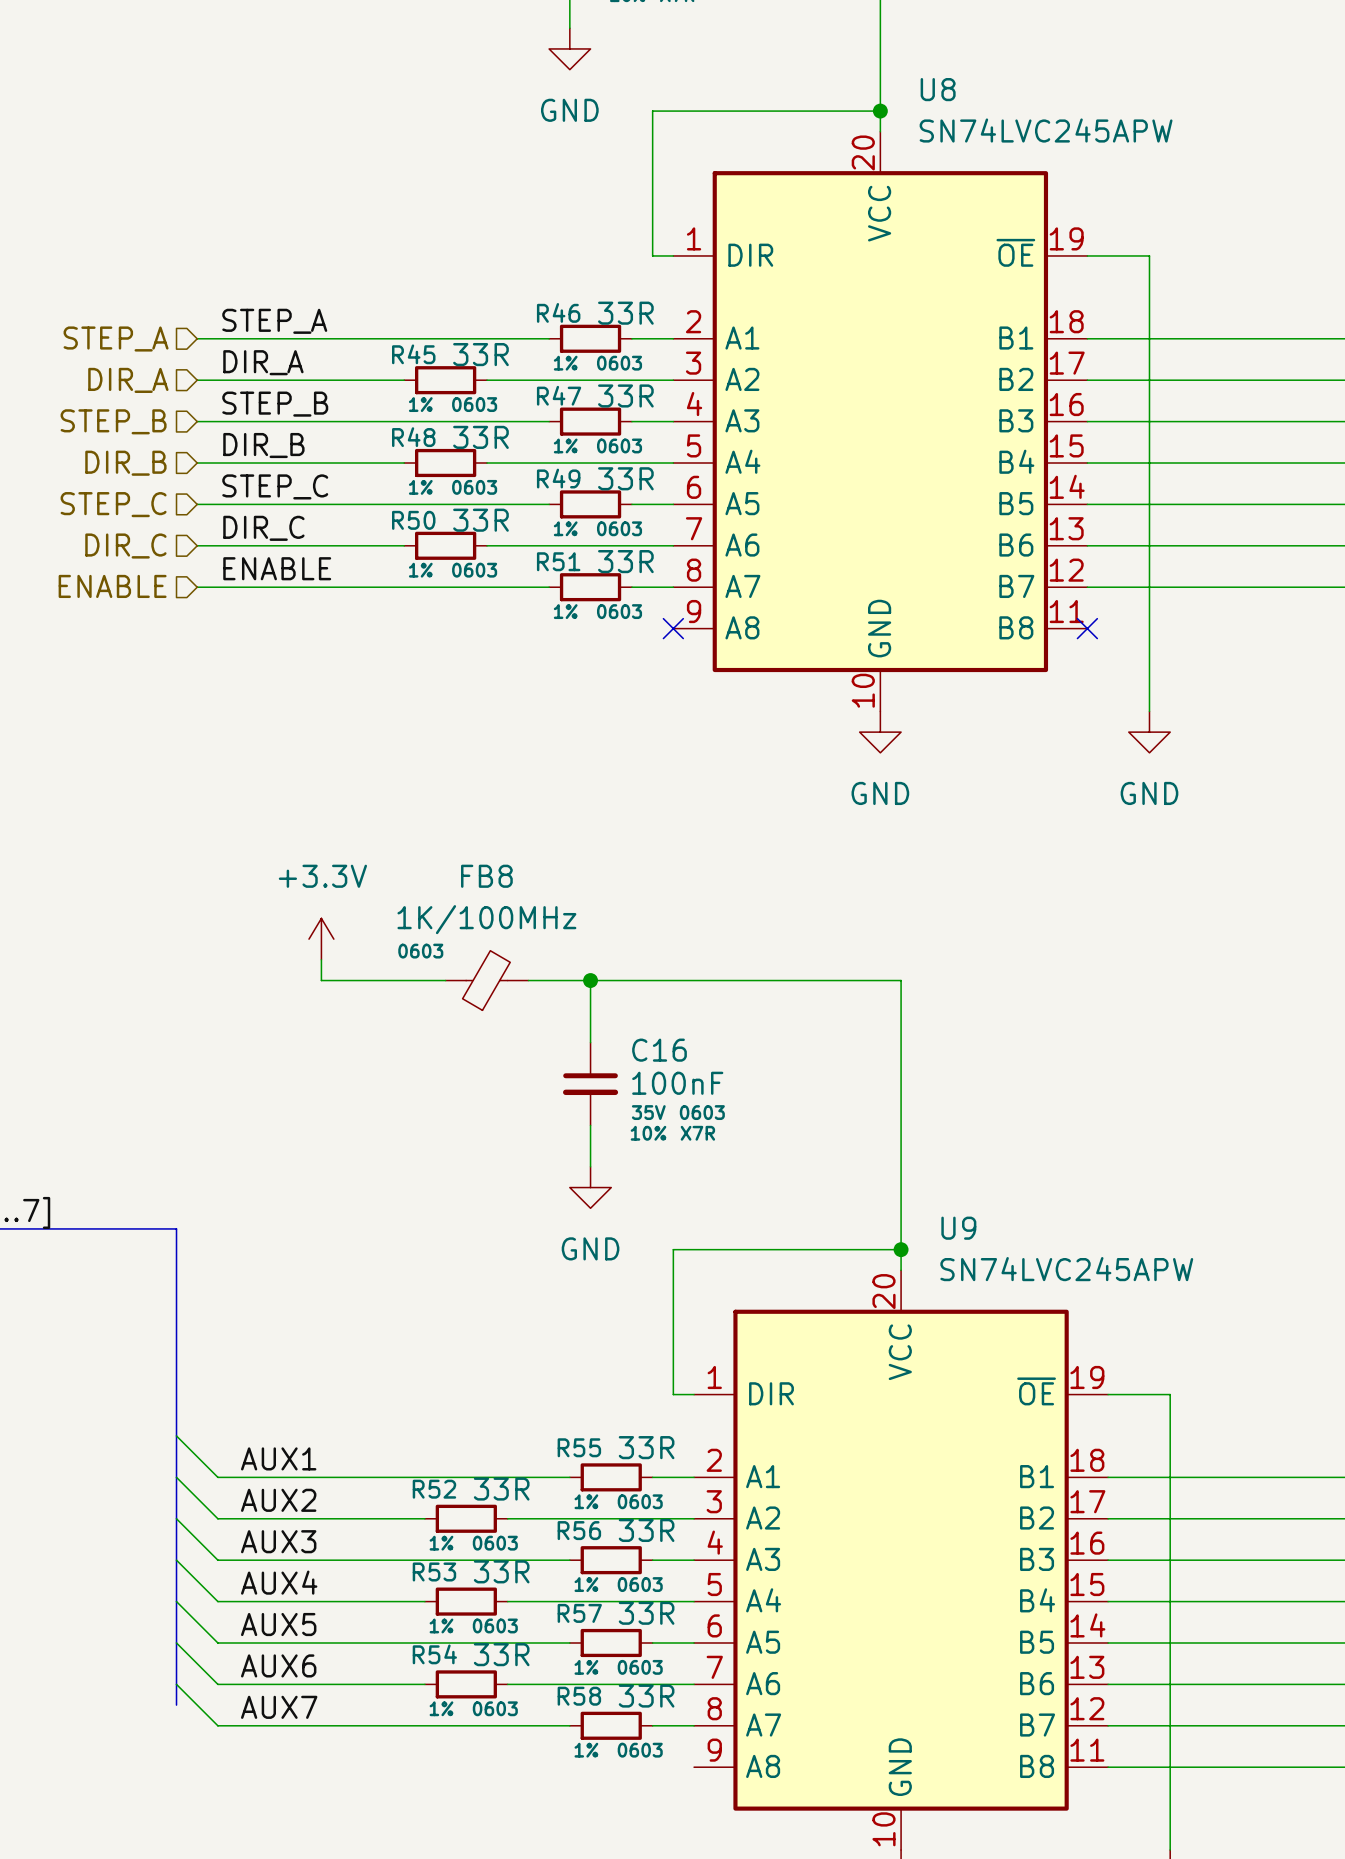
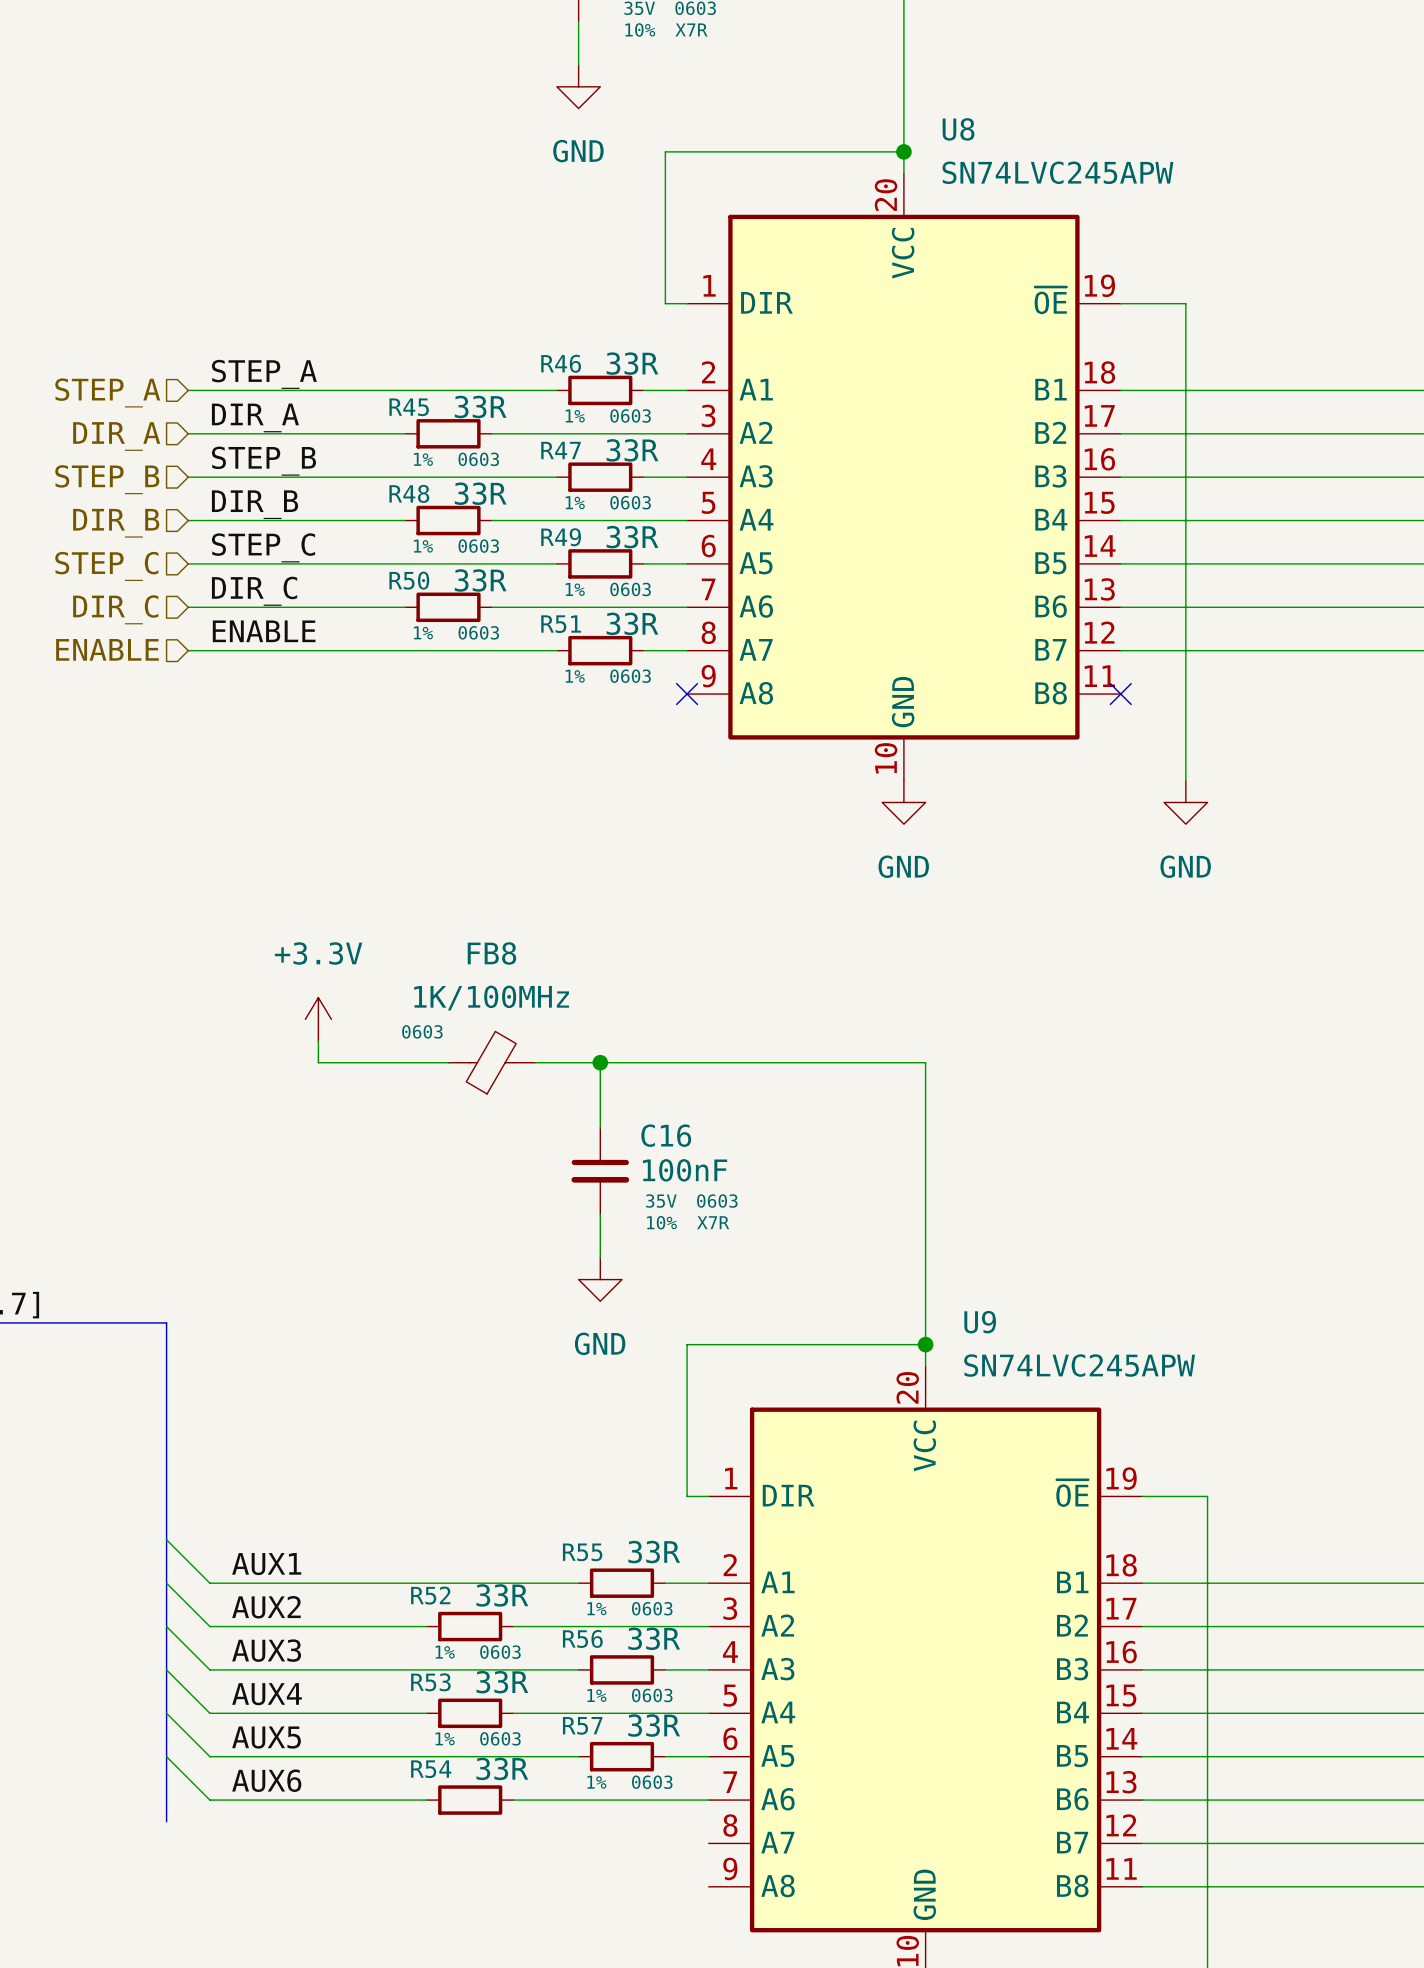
wire: (176, 1684) (217, 1725) (569, 1725) -> none
label: AUX7 (279, 1707) -> none
R54 text: 1% (441, 1708) -> none
R54 text: 0603 (495, 1708) -> none
R58: 33R (611, 1725) -> none
wire: (652, 1725) (694, 1725) -> none

